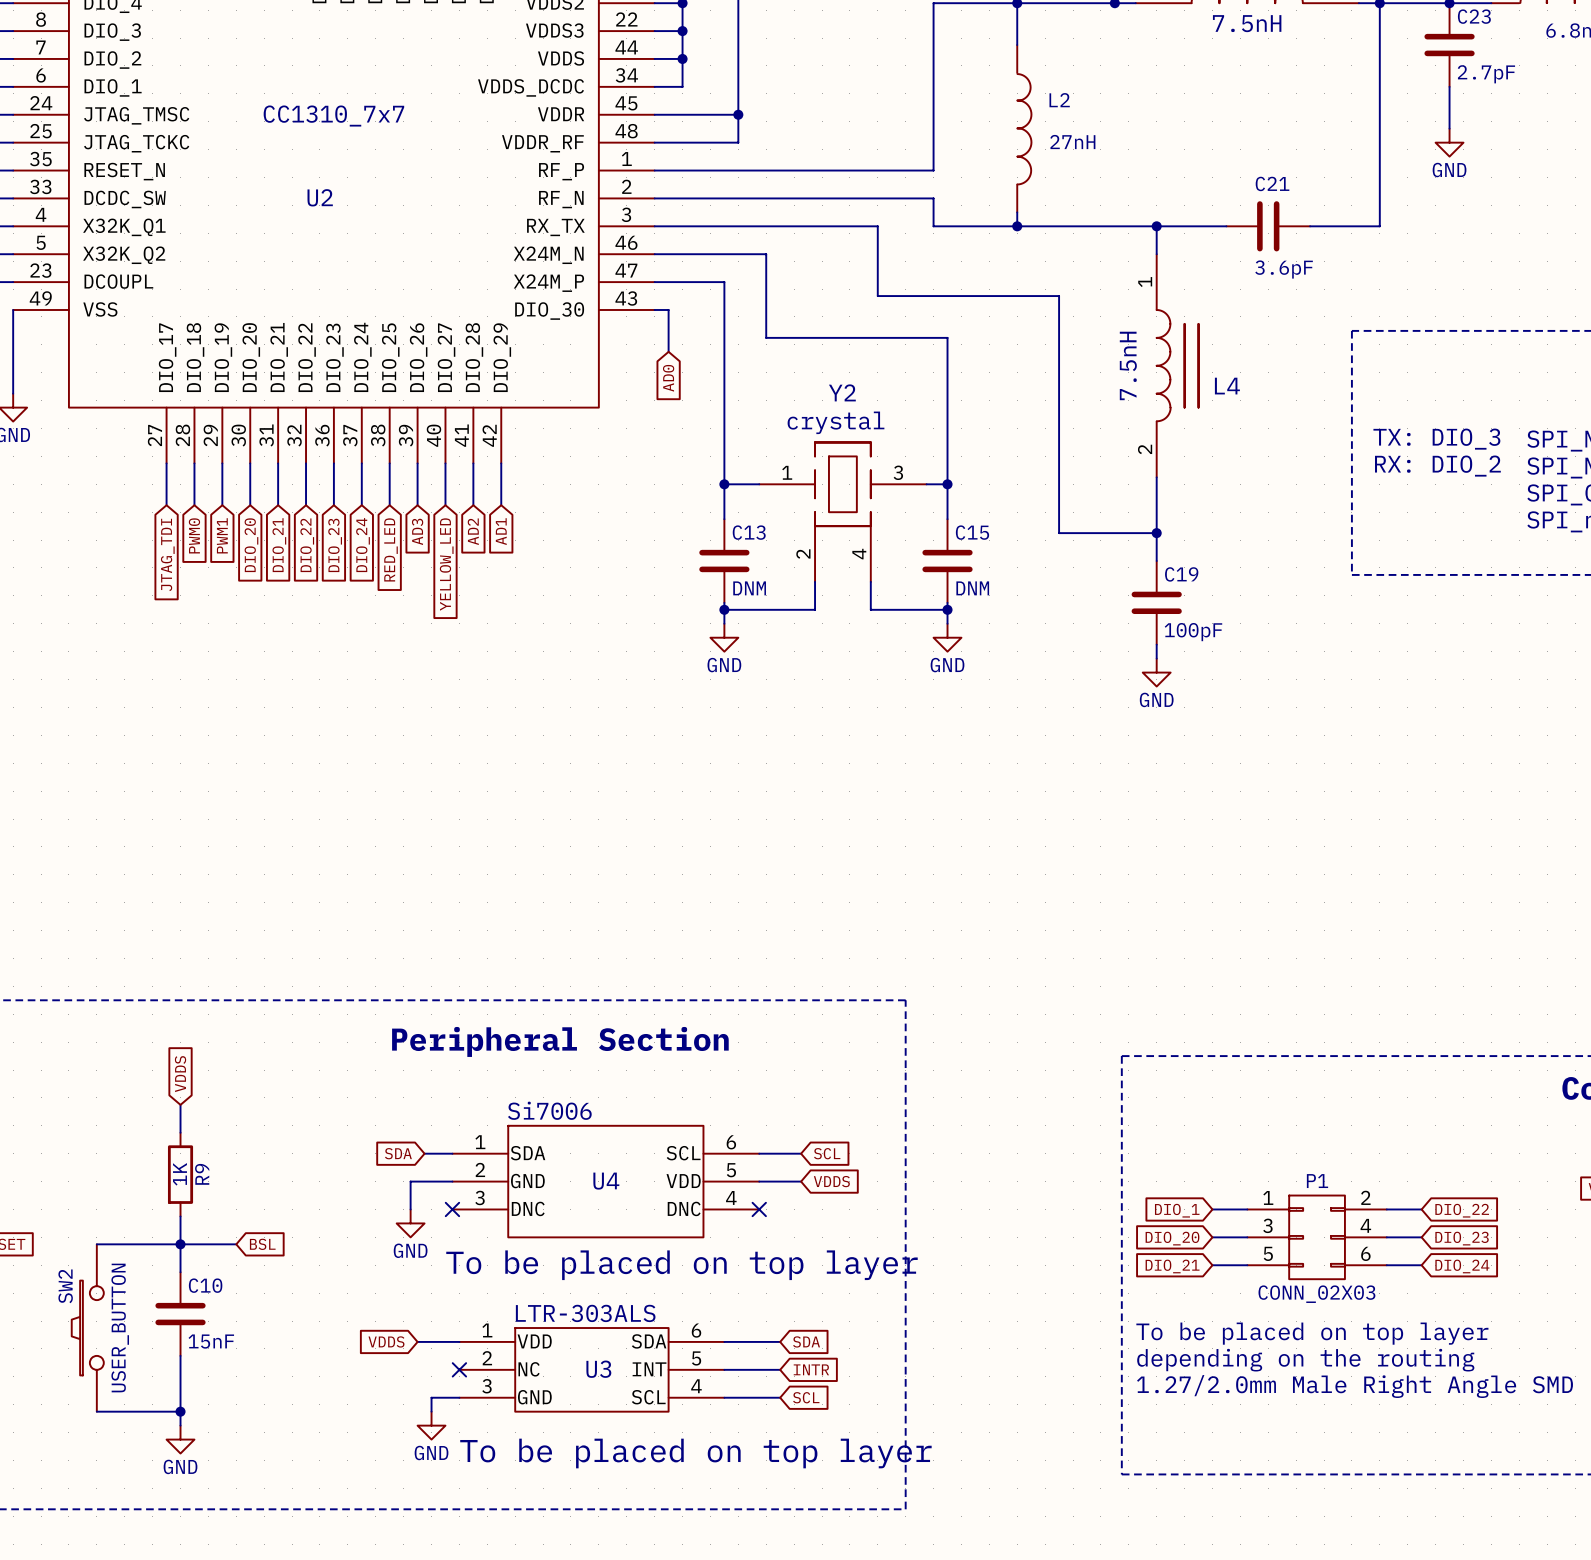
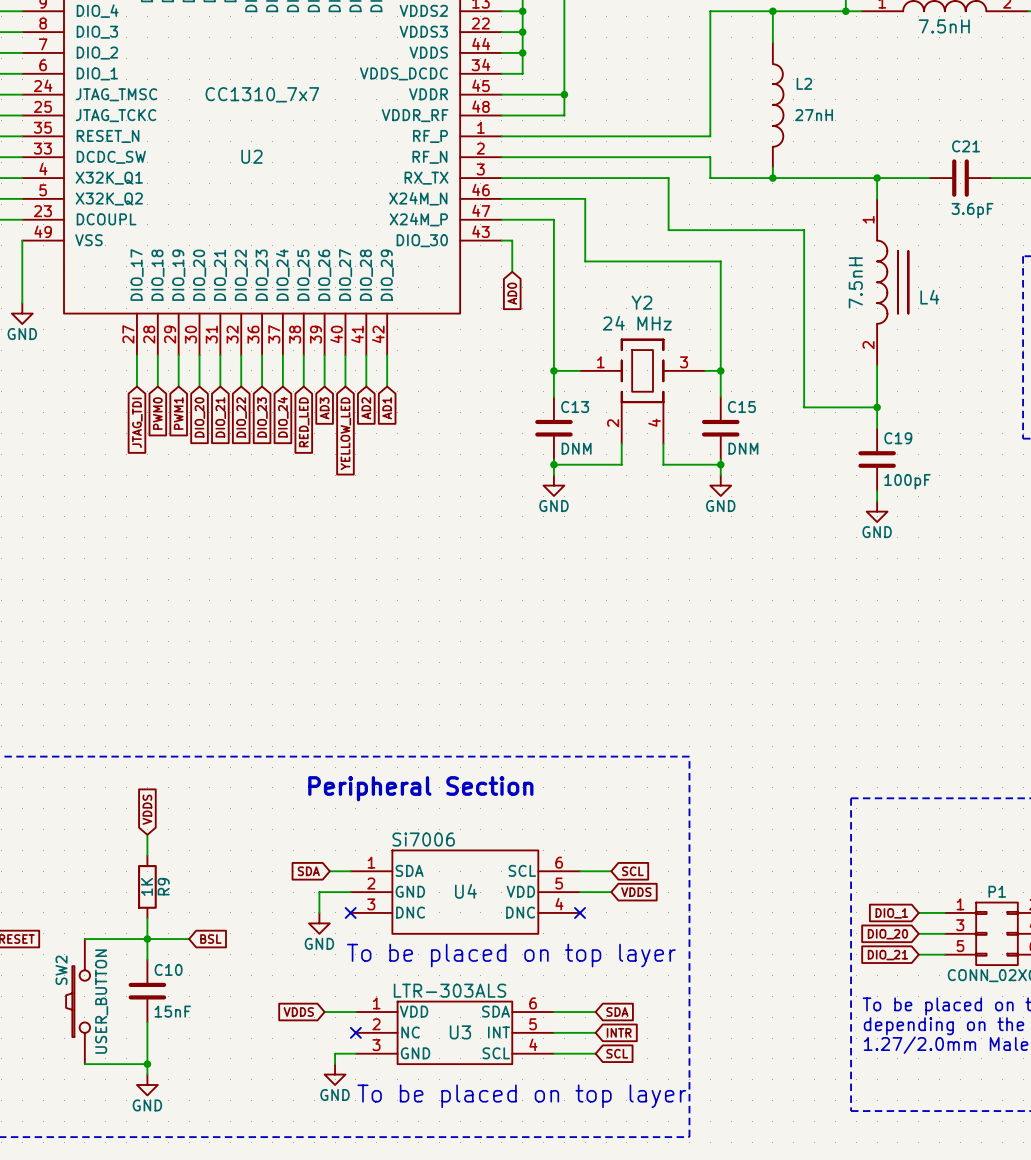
Y2 value: crystal (836, 422) -> 24 MHz (637, 323)

